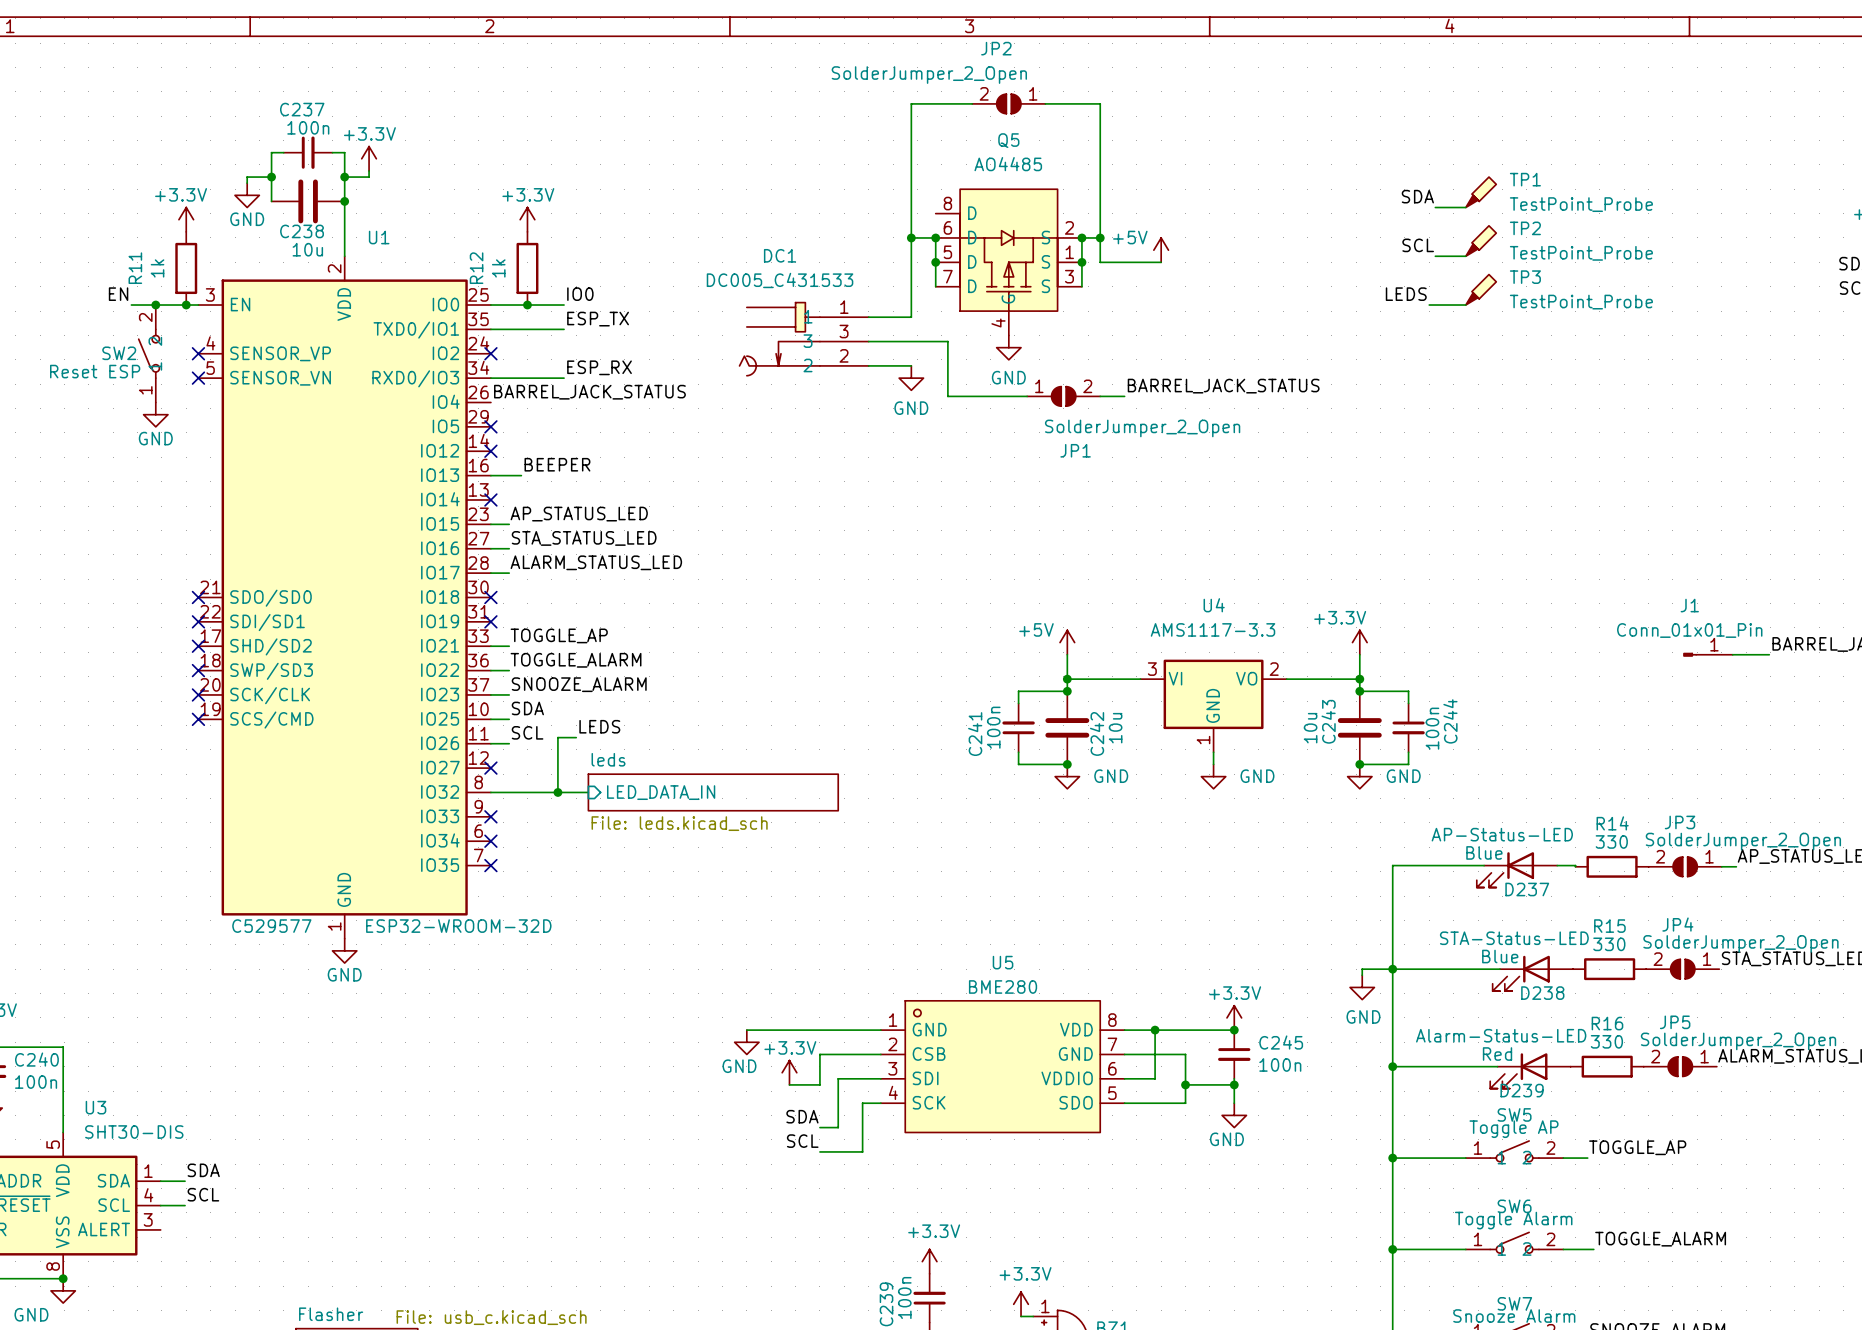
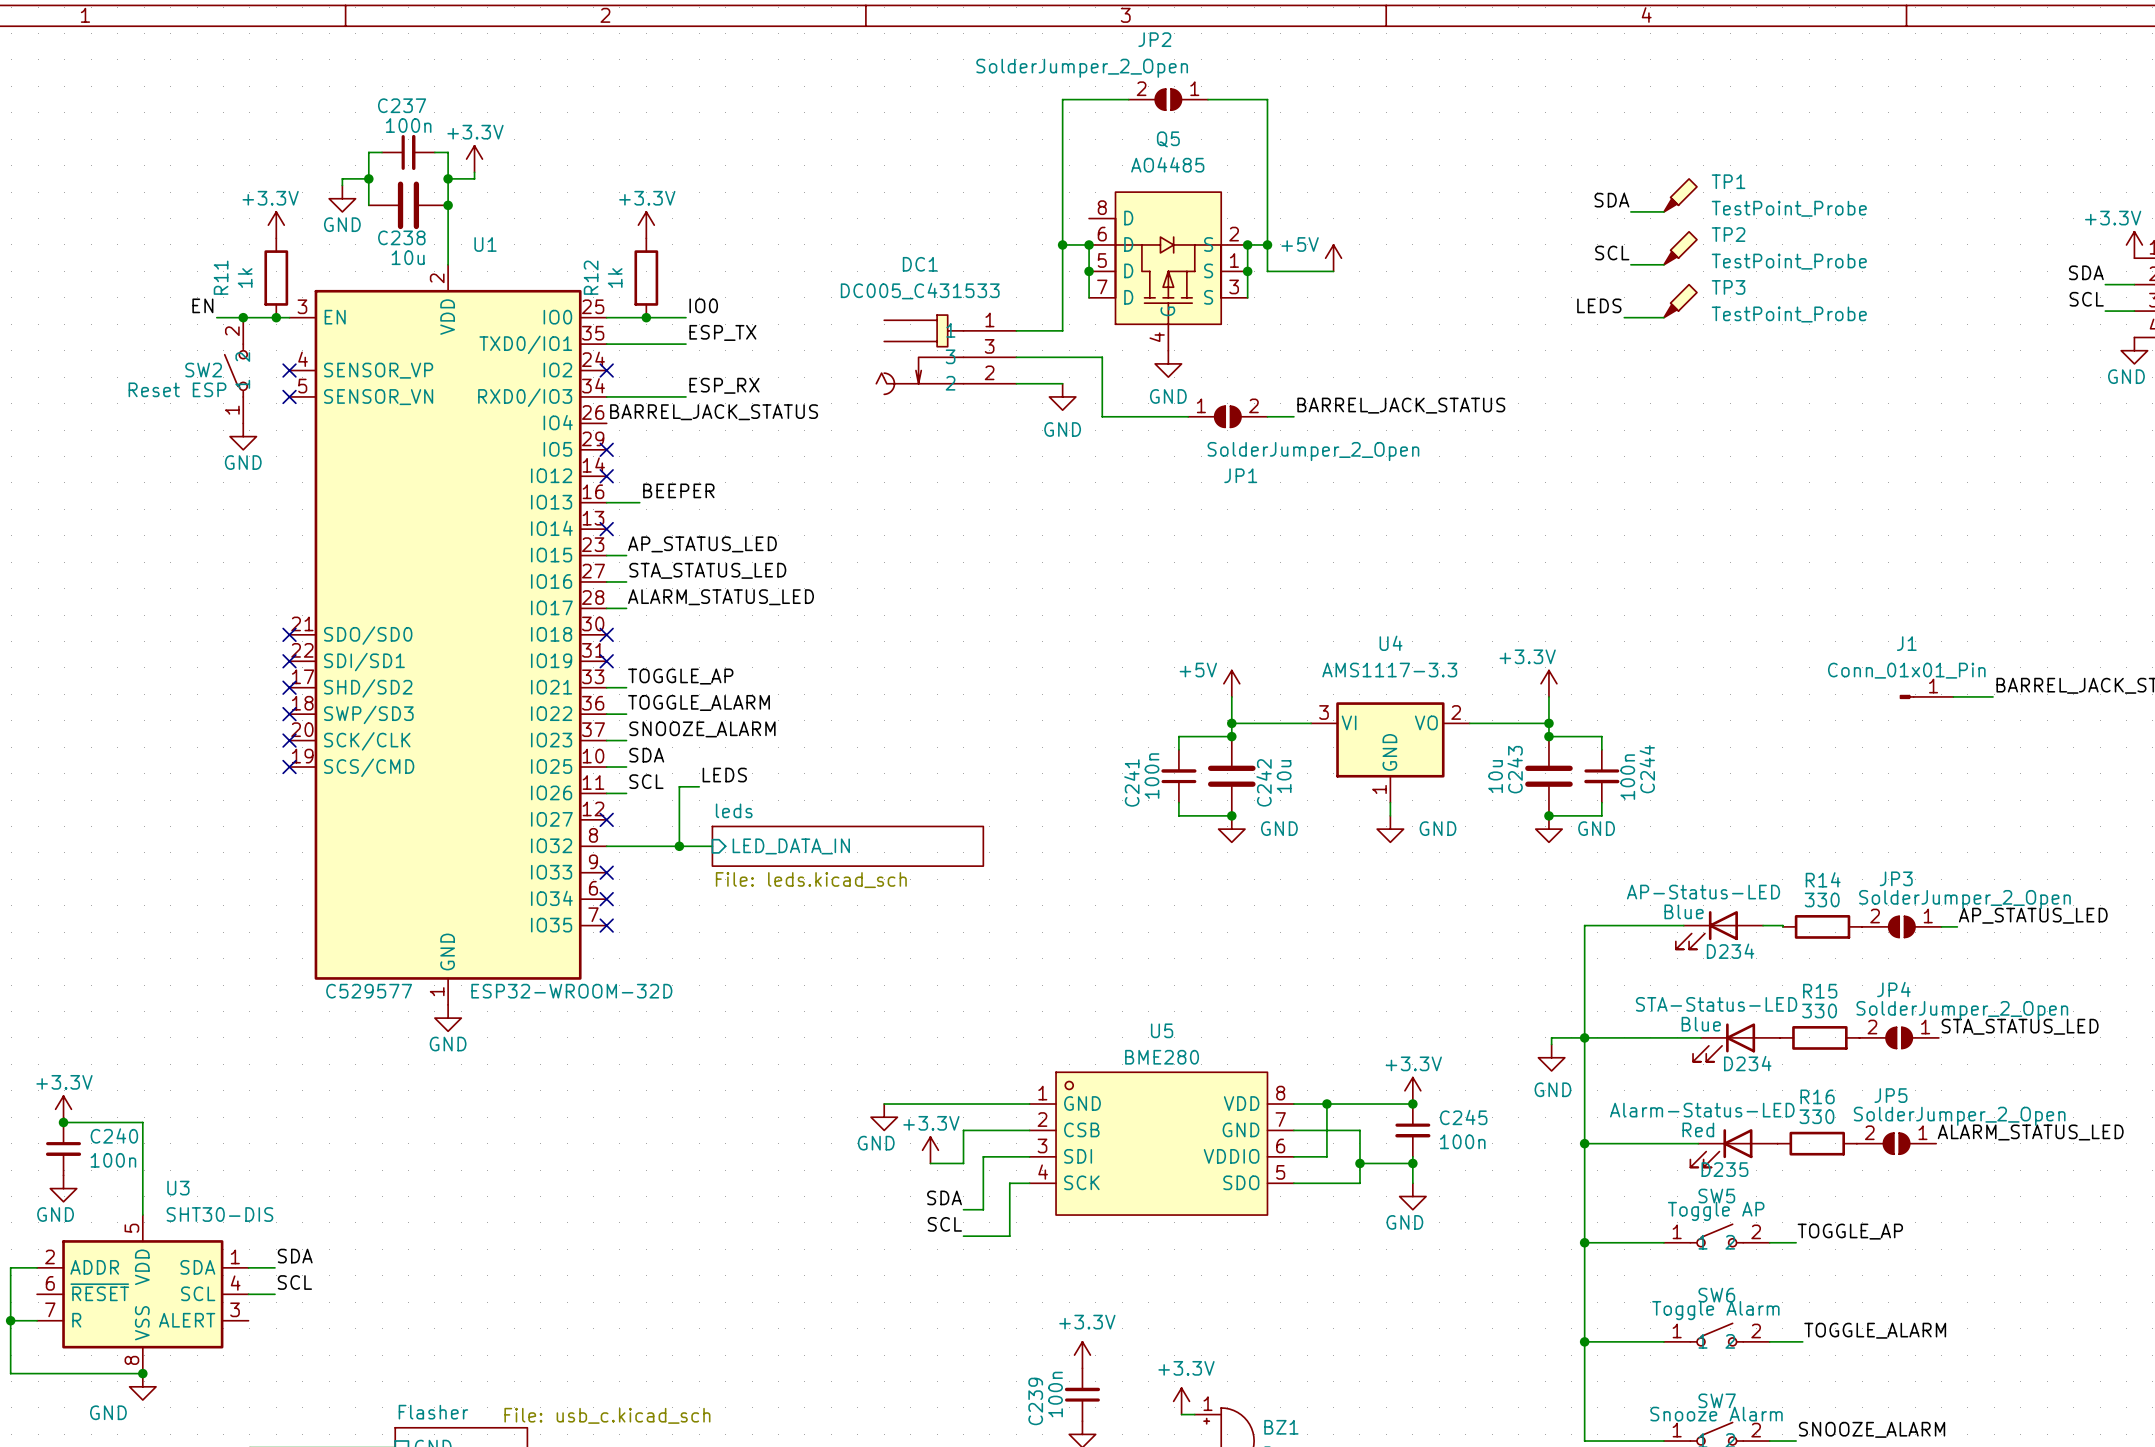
D237 name: D237 (1527, 889) -> D234 (1730, 951)
D238 name: D238 (1542, 993) -> D234 (1747, 1063)
D239 name: D239 (1522, 1090) -> D235 (1724, 1169)

